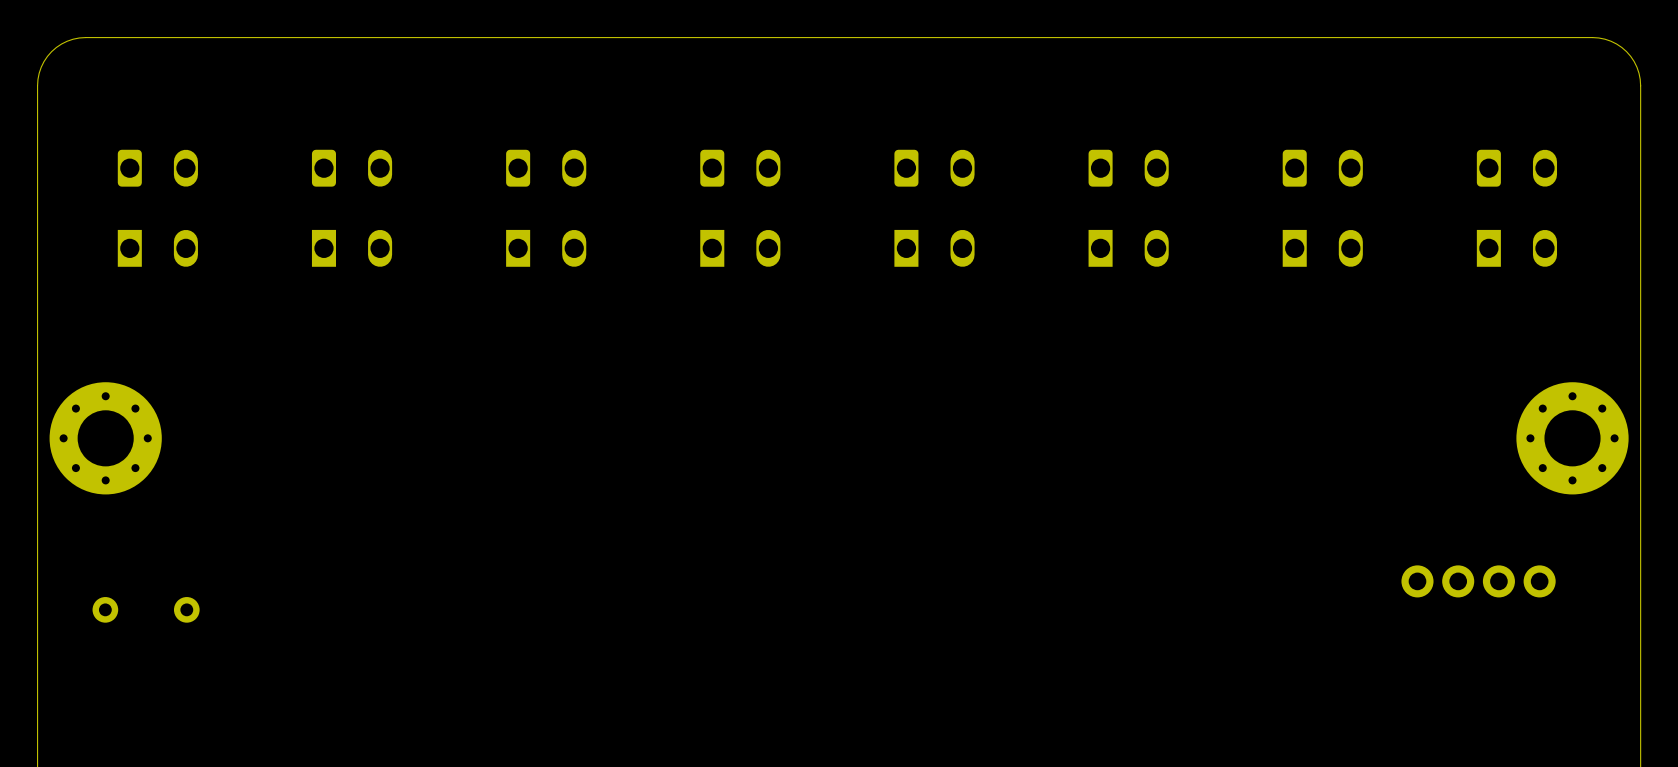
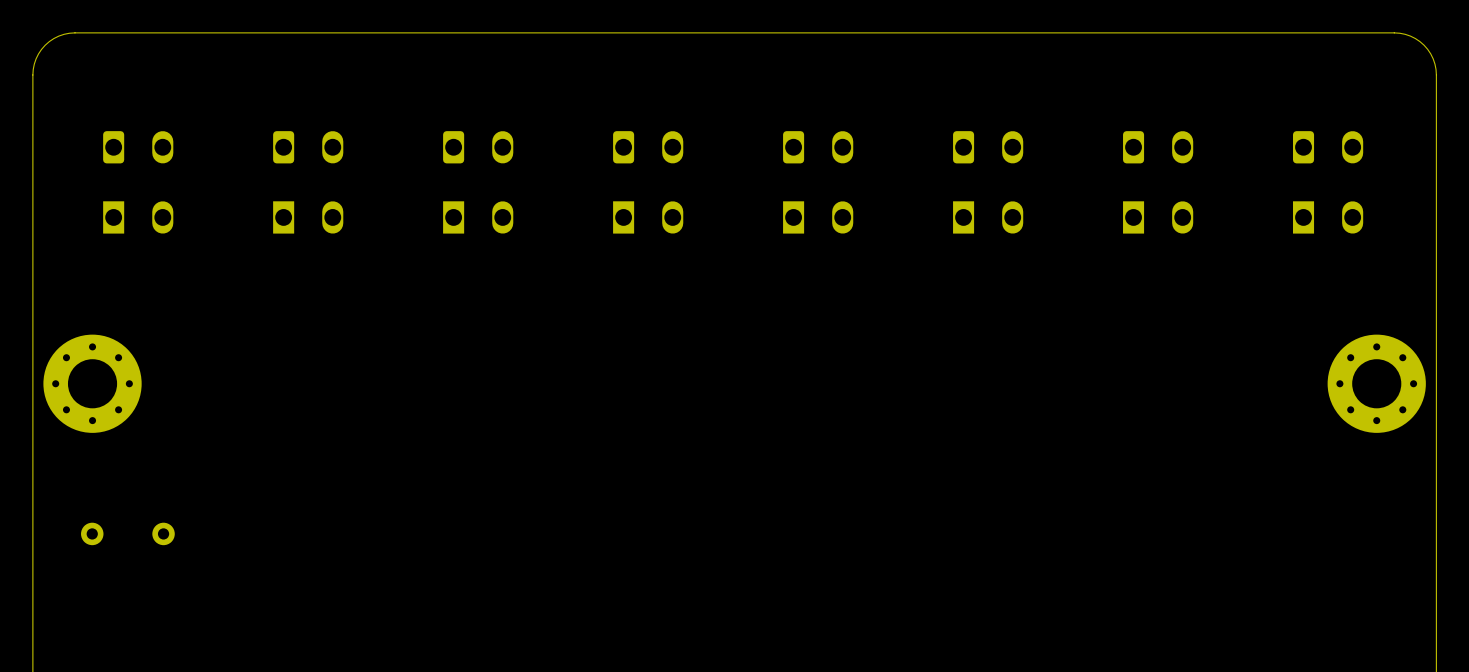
part: (1478, 581) -> none

